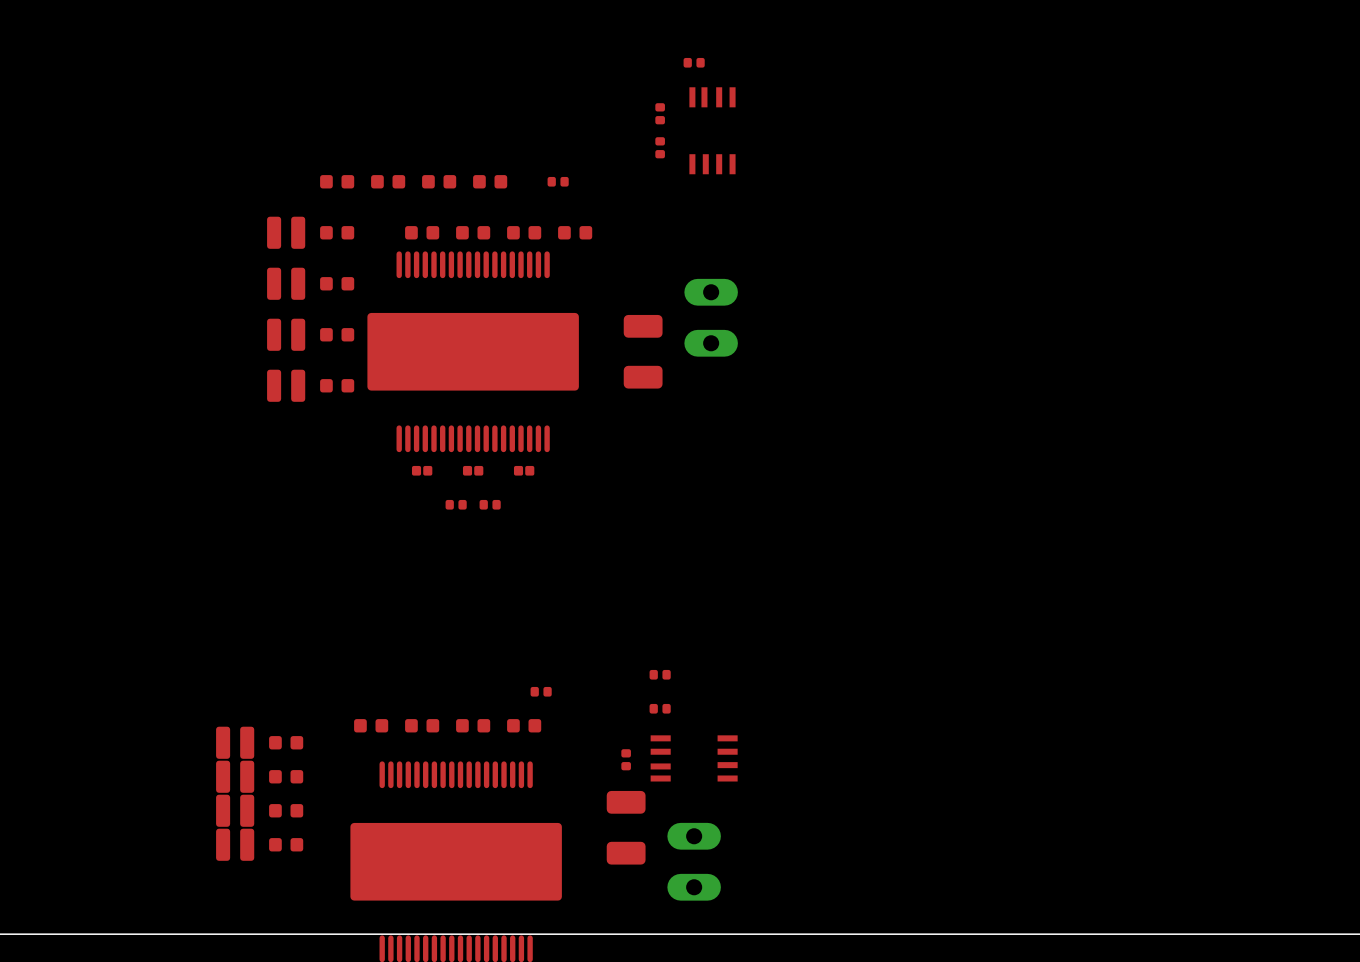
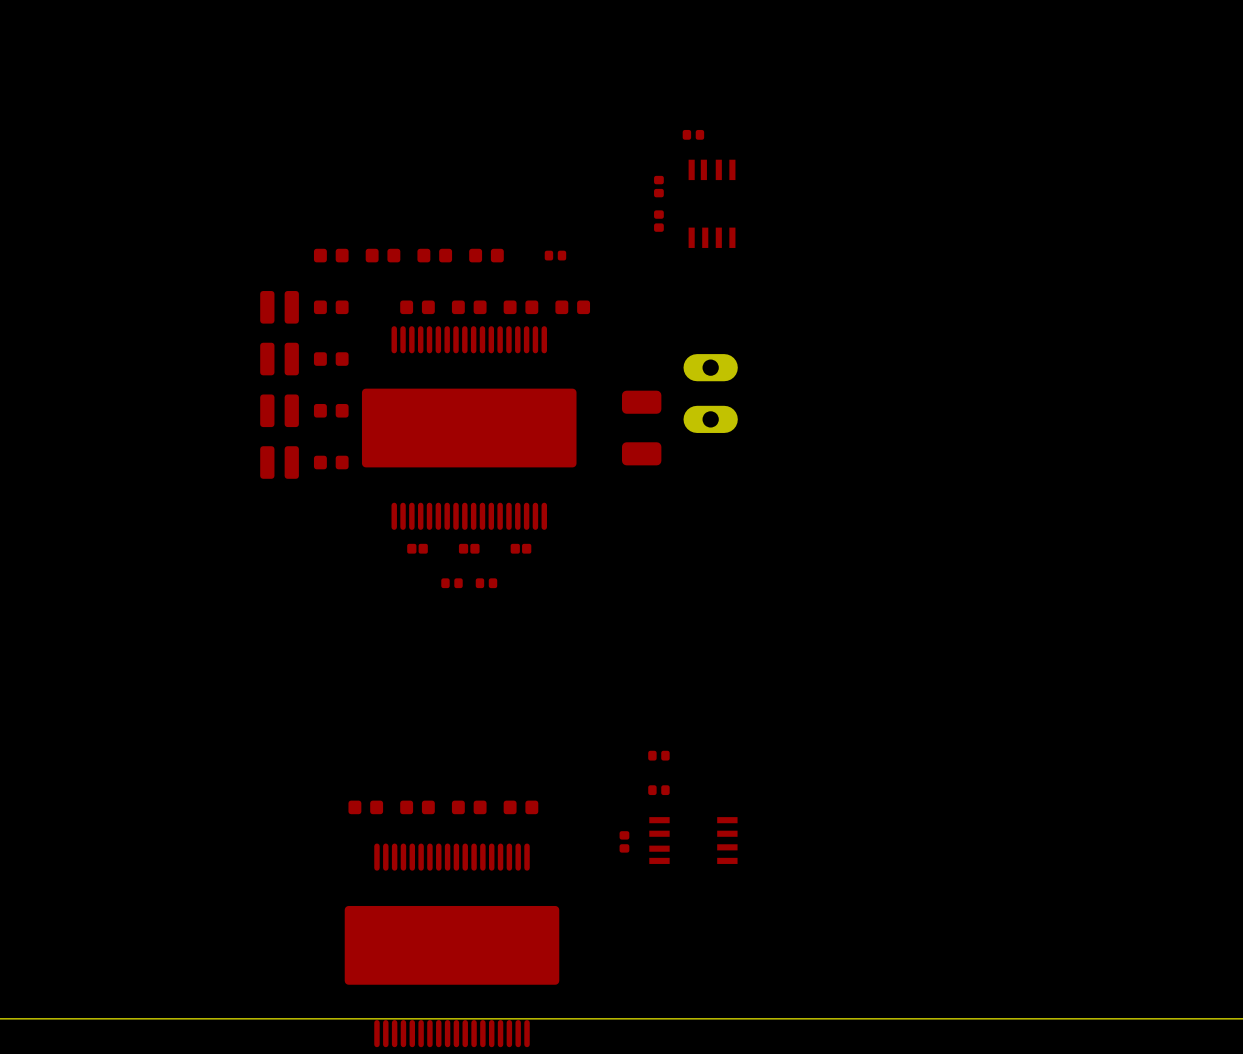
part: (541, 691) -> none
part: (235, 742) -> none
part: (286, 742) -> none
part: (235, 776) -> none
part: (286, 776) -> none
part: (235, 810) -> none
part: (286, 810) -> none
part: (626, 827) -> none
part: (235, 844) -> none
part: (286, 844) -> none
part: (694, 861) -> none

